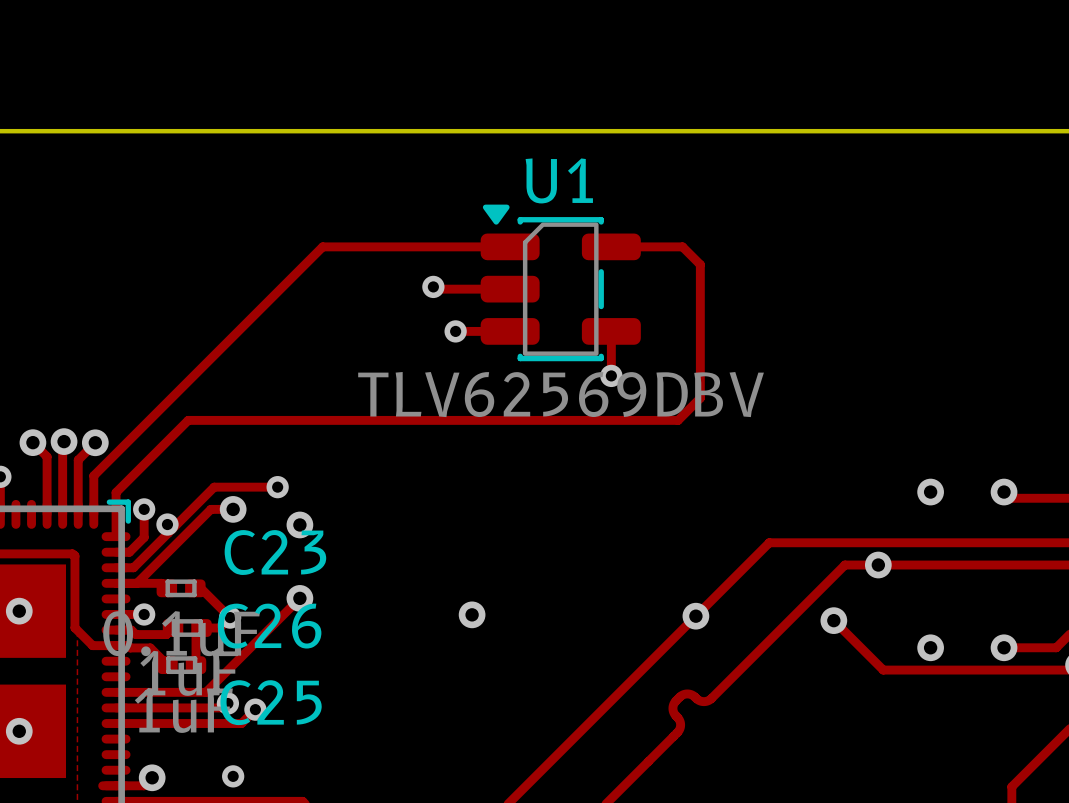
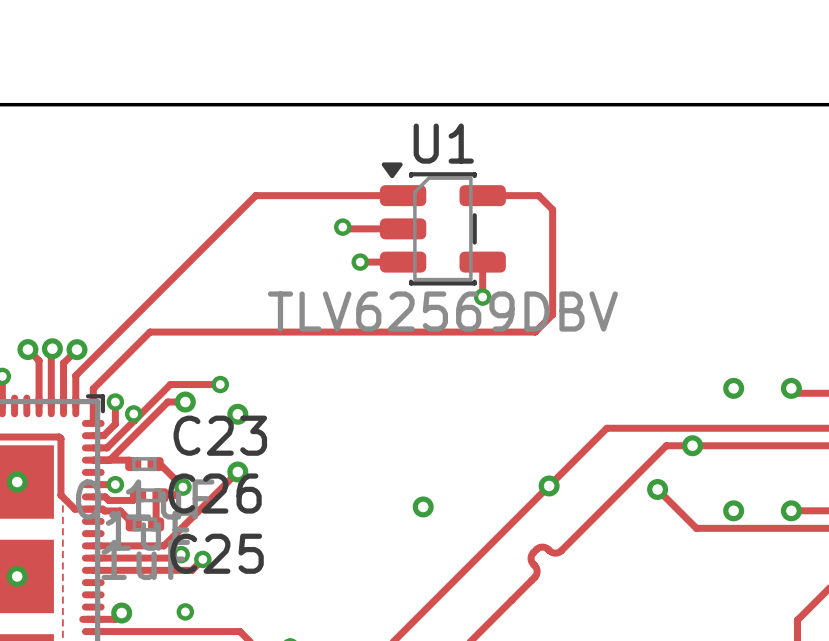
via position: (472, 614) -> (423, 506)

